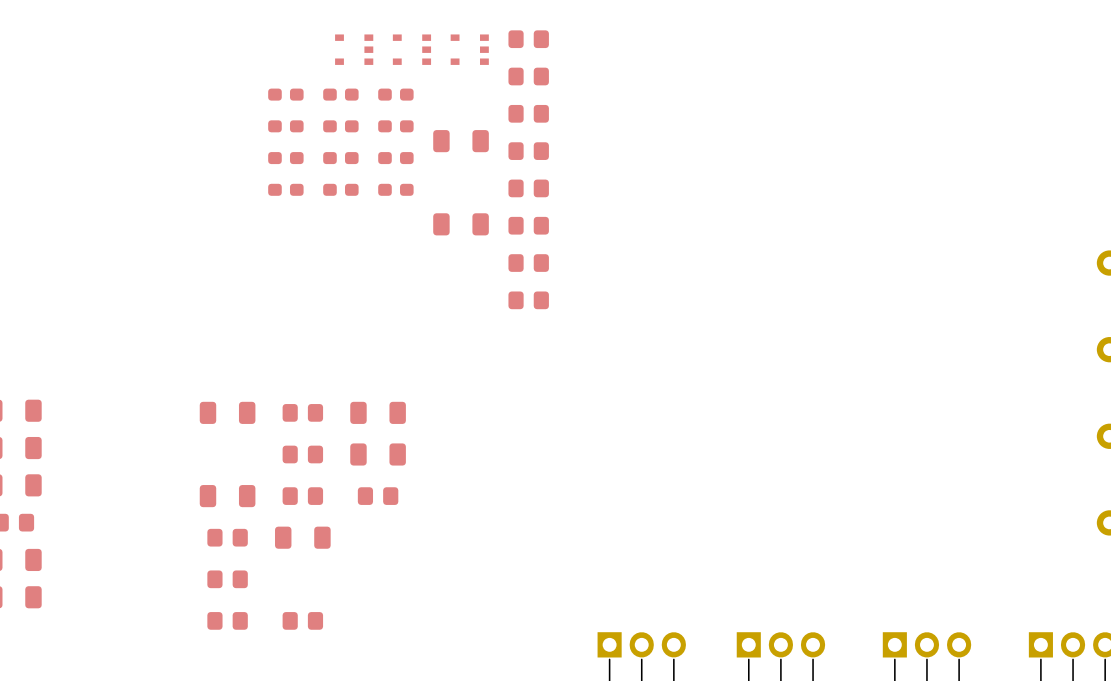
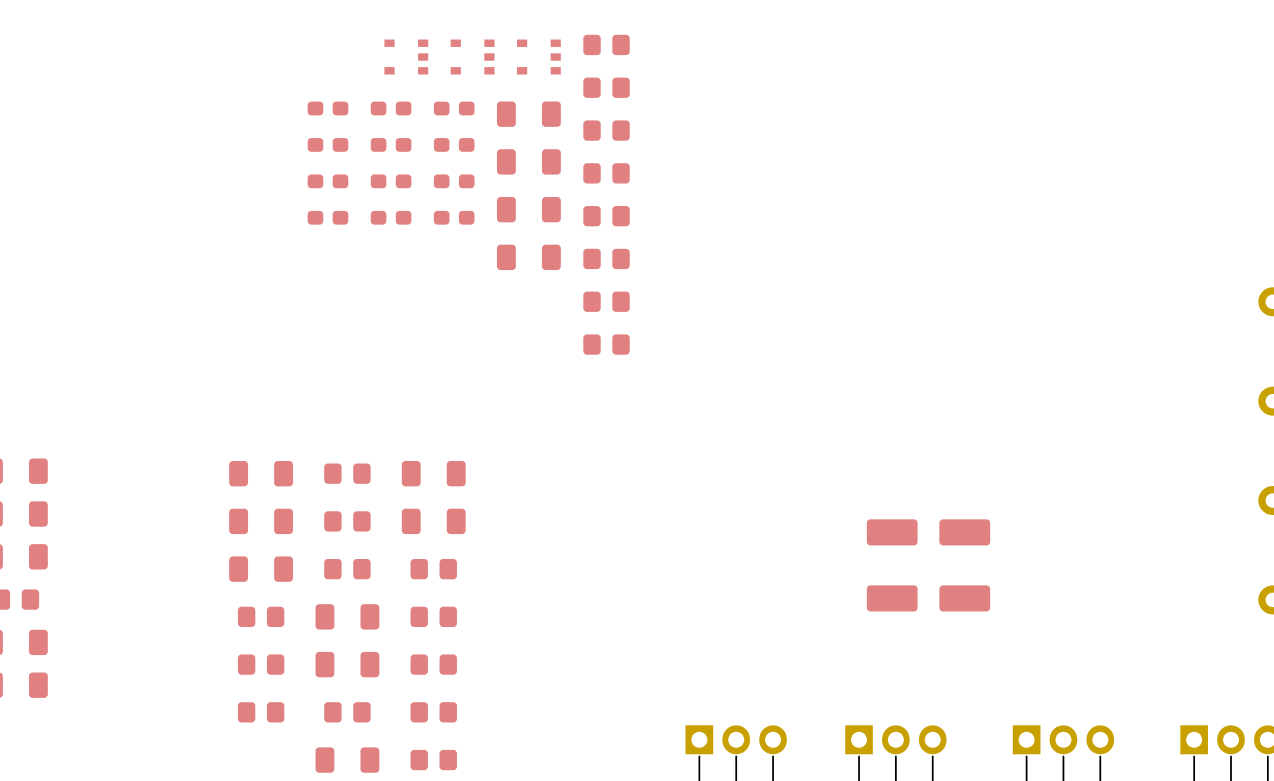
part: none -> (528, 114)
part: none -> (528, 209)
part: none -> (261, 521)
part: none -> (928, 532)
part: none -> (928, 598)
part: none -> (433, 616)
part: none -> (347, 664)
part: none -> (433, 664)
part: none -> (433, 712)
part: none -> (347, 760)
part: none -> (433, 760)

